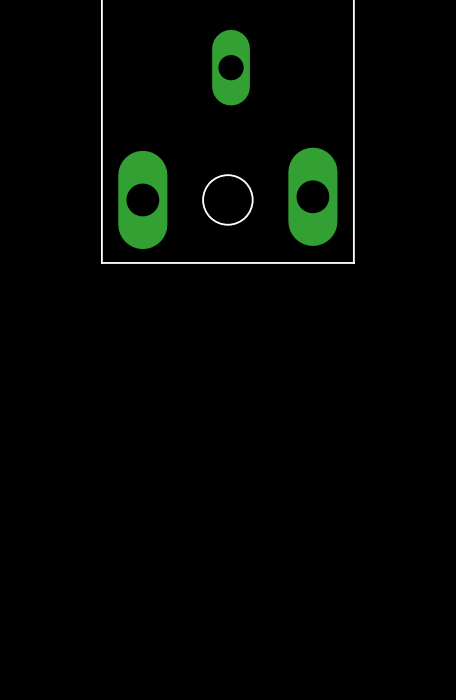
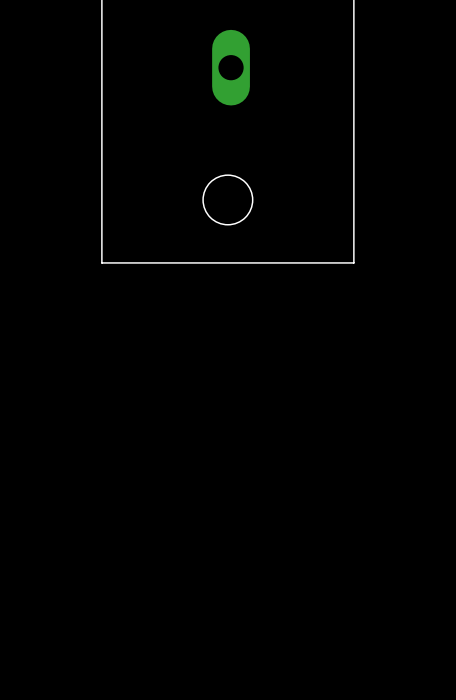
part: (312, 196) -> none
part: (142, 199) -> none

